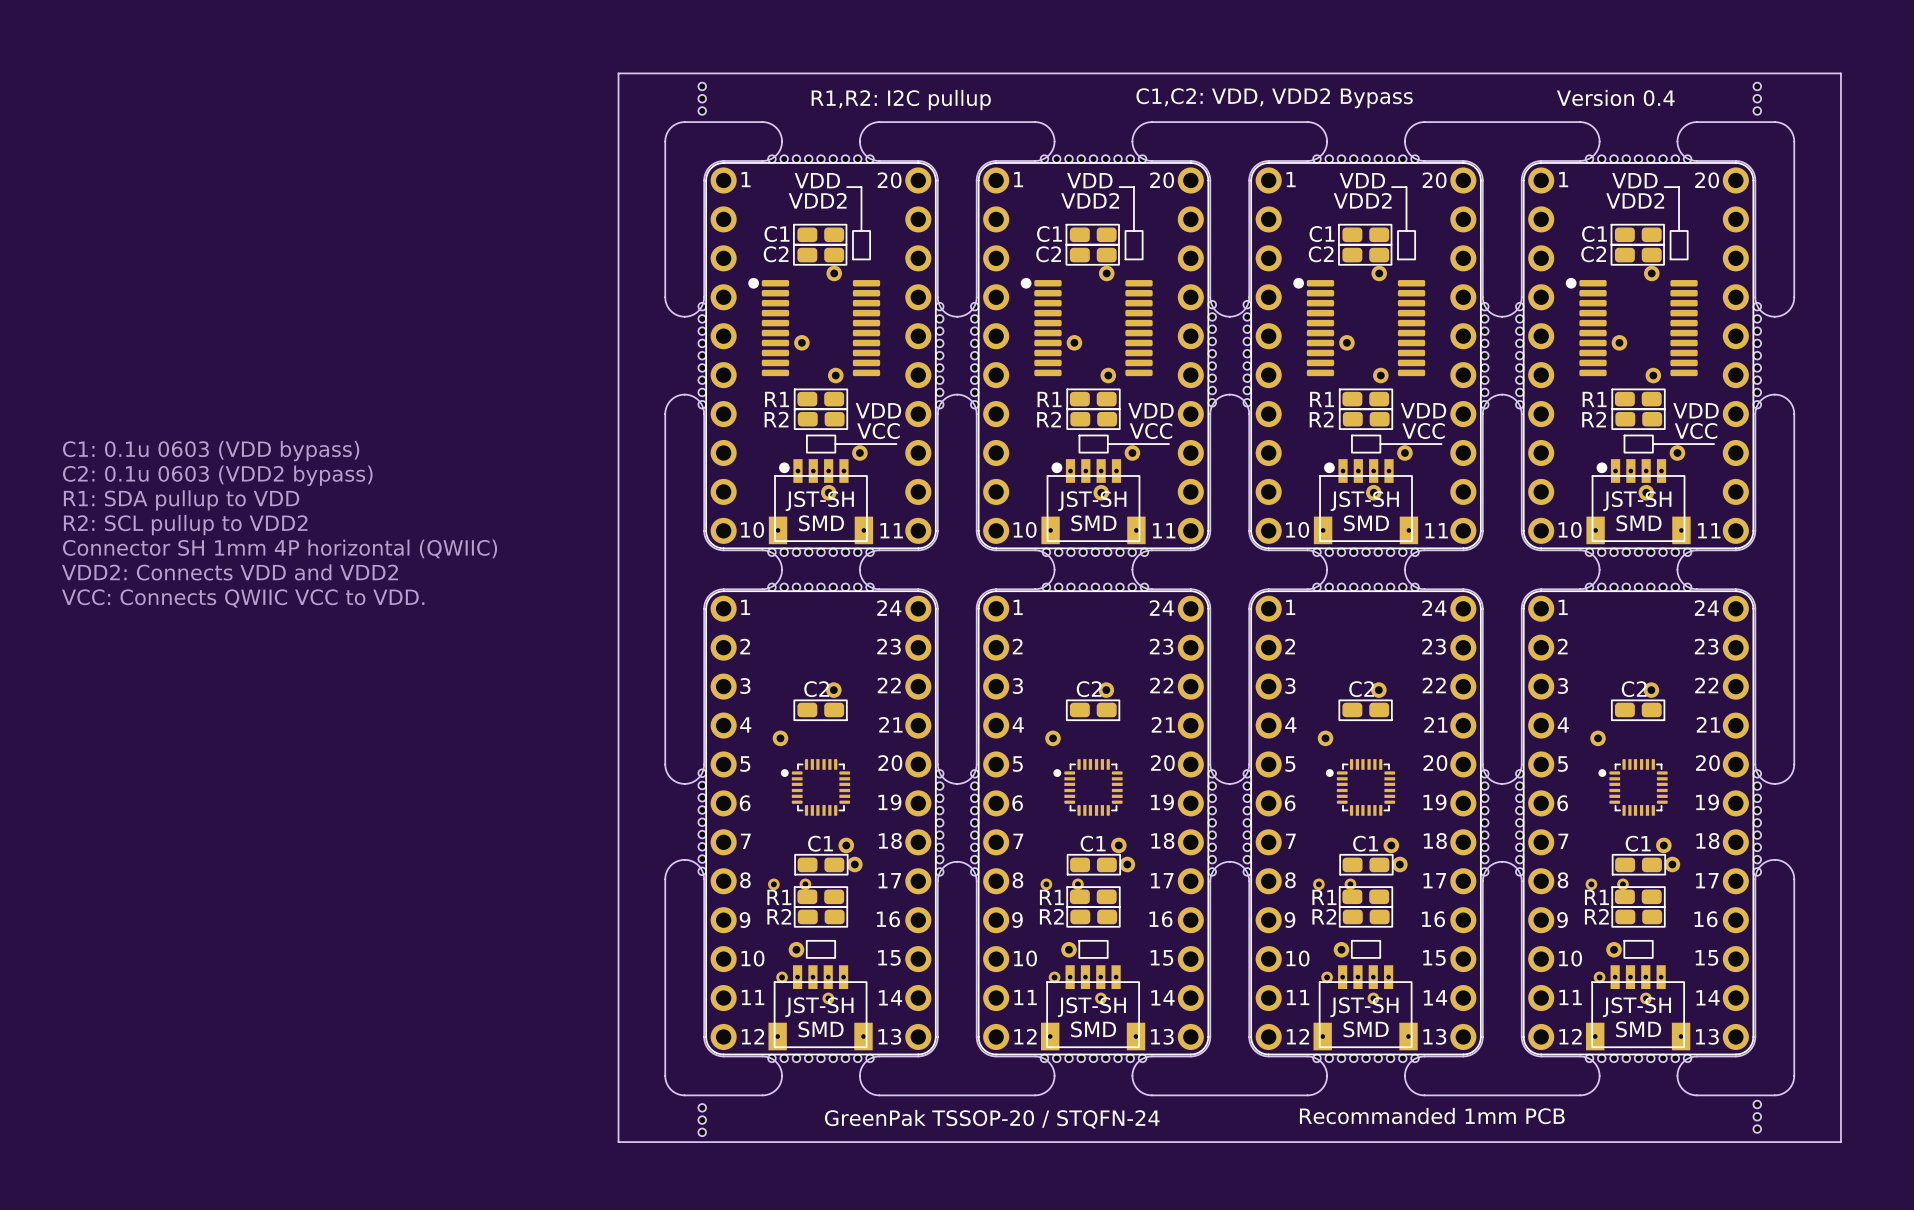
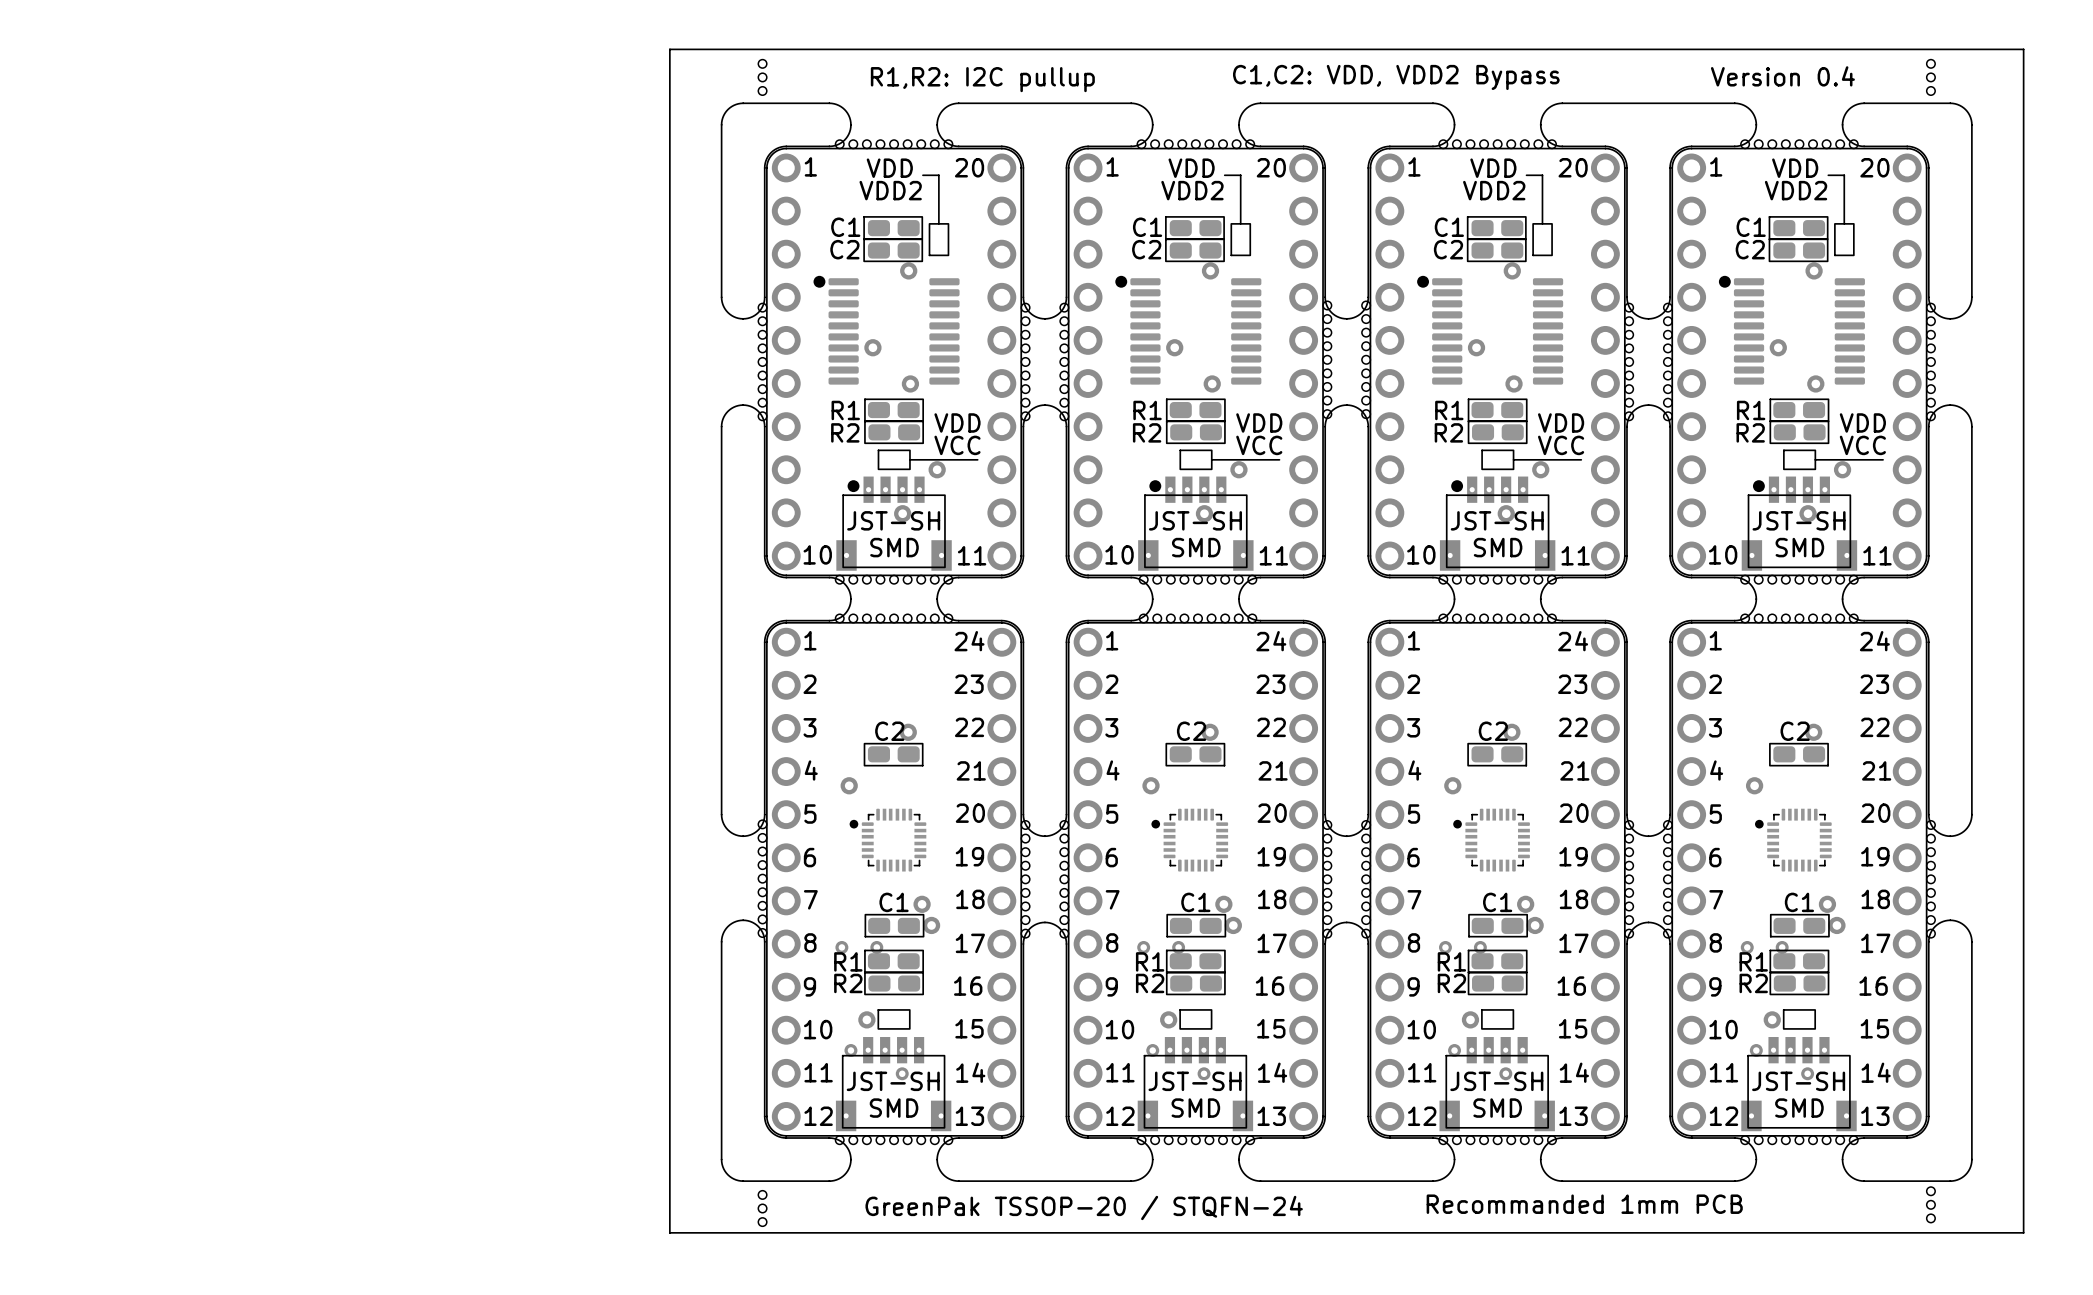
text: C1: 0.1u 0603 (VDD bypass) (211, 451) -> none
text: C2: 0.1u 0603 (VDD2 bypass) (217, 475) -> none
text: R1: SDA pullup to VDD (181, 500) -> none
text: R2: SCL pullup to VDD2 (185, 525) -> none
text: Connector SH 1mm 4P horizontal (QWIIC) (280, 548) -> none
text: VDD2: Connects VDD and VDD2 (229, 572) -> none
text: VCC: Connects QWIIC VCC to VDD. (243, 598) -> none

